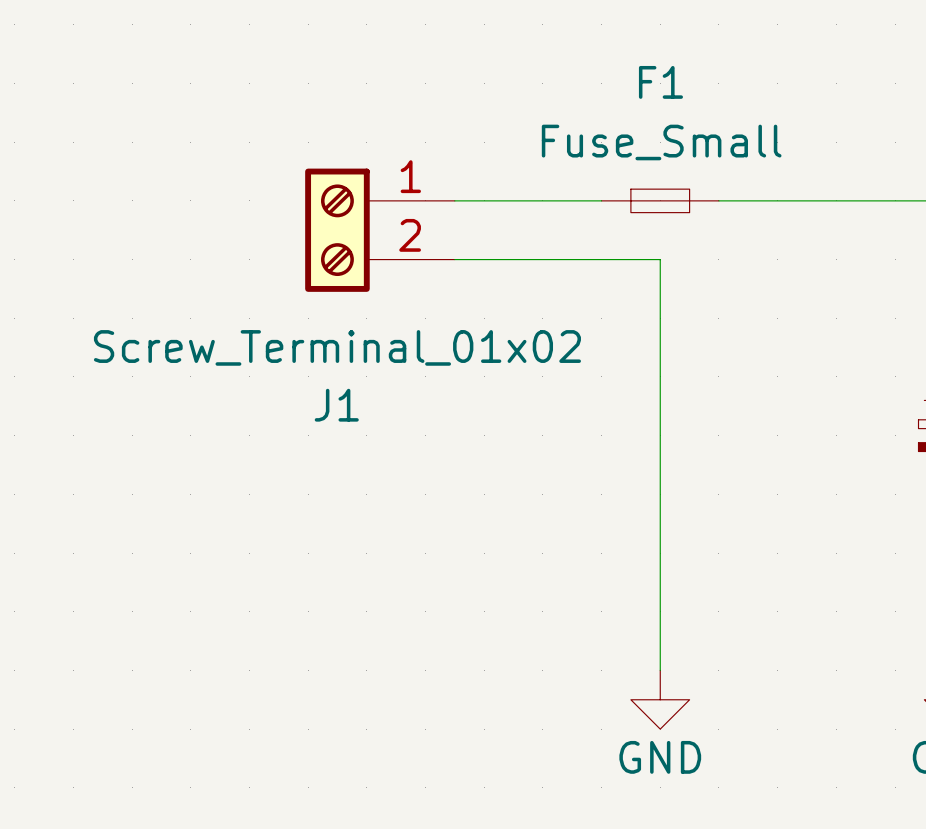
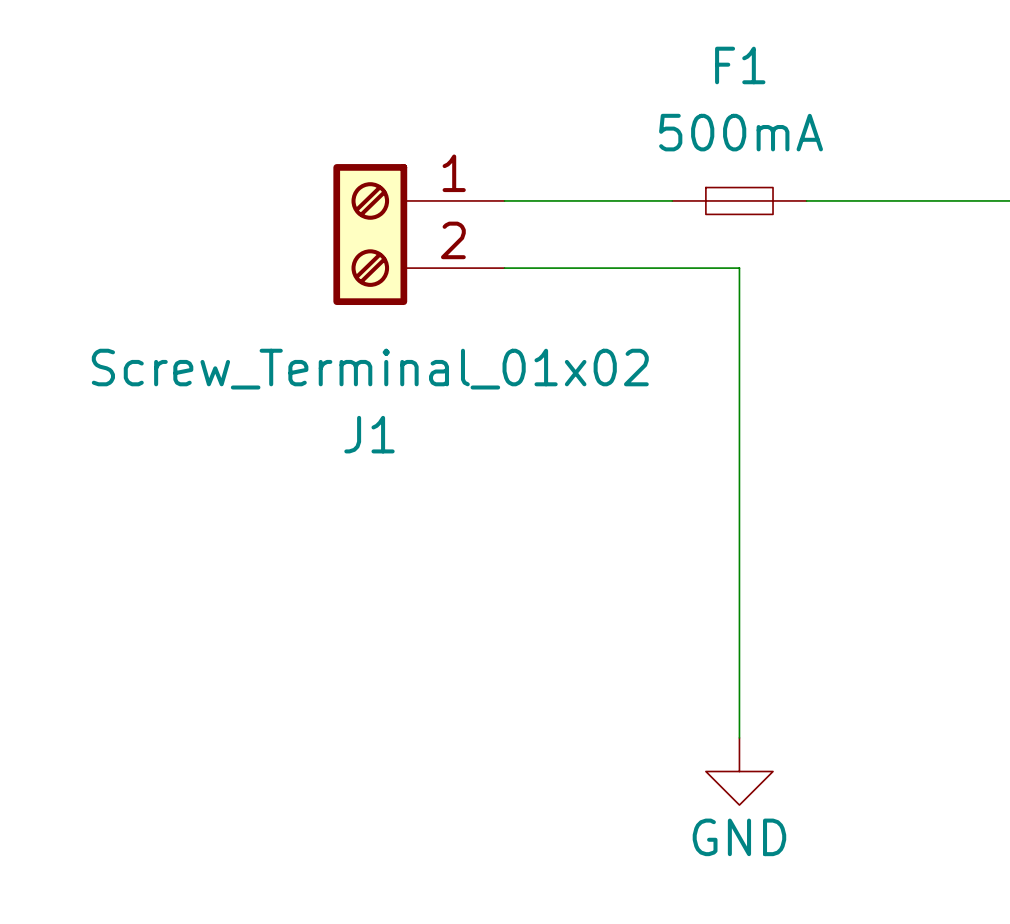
F1 value: Fuse_Small (661, 142) -> 500mA (741, 132)

